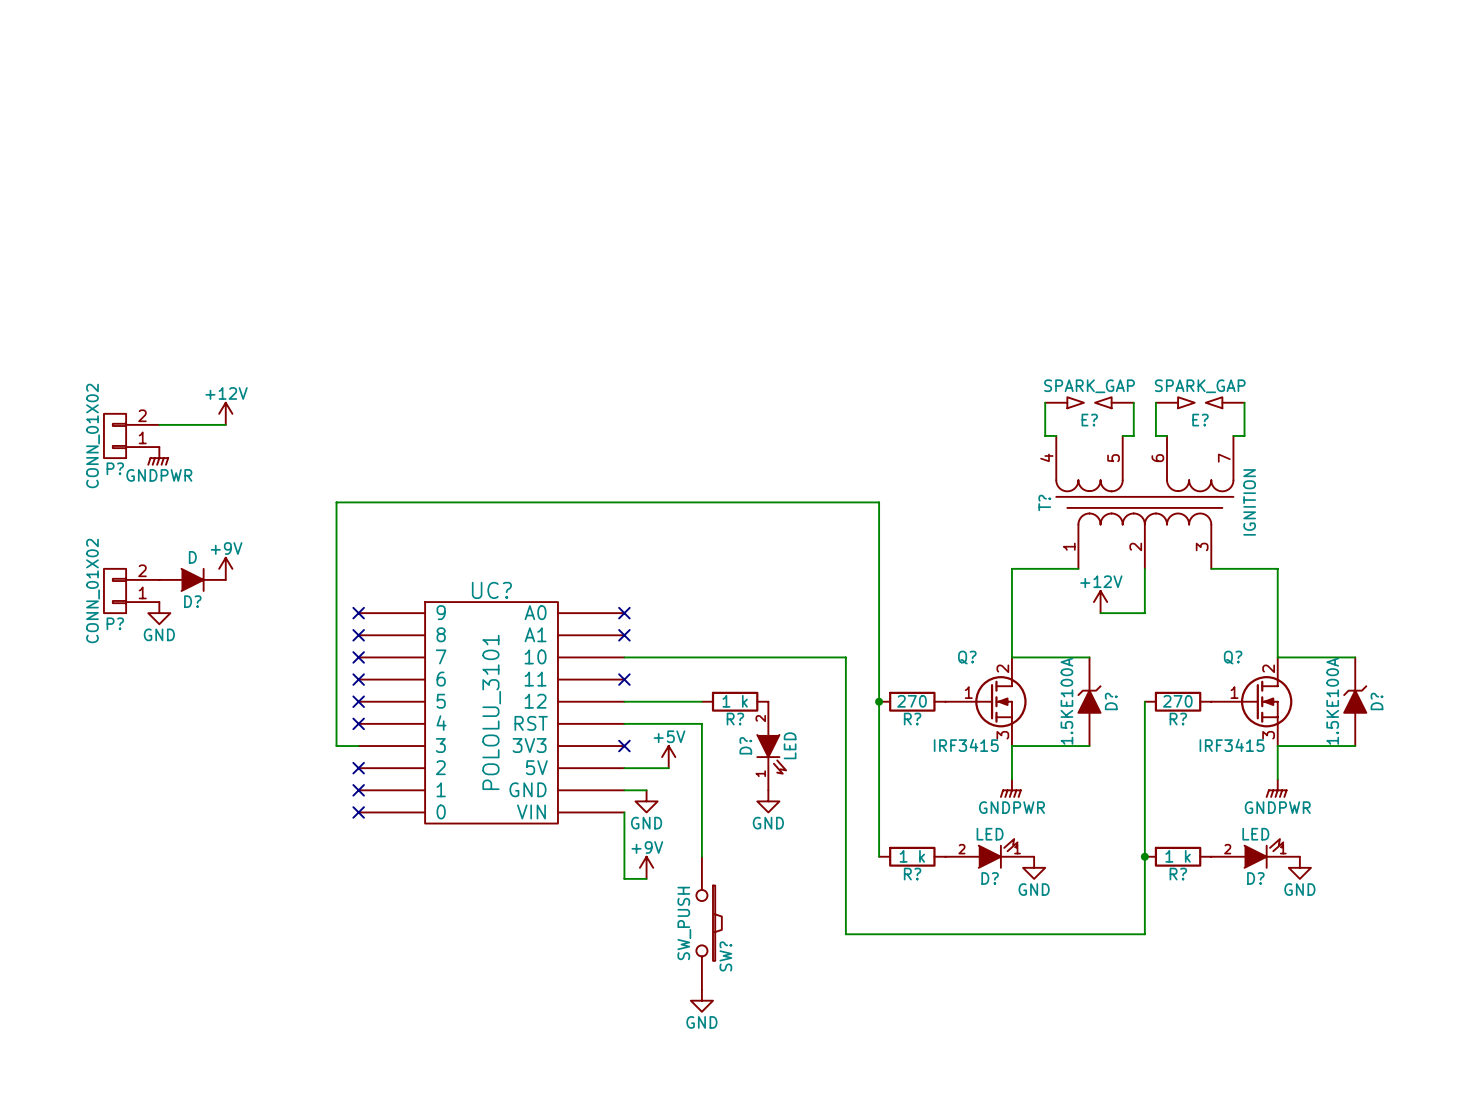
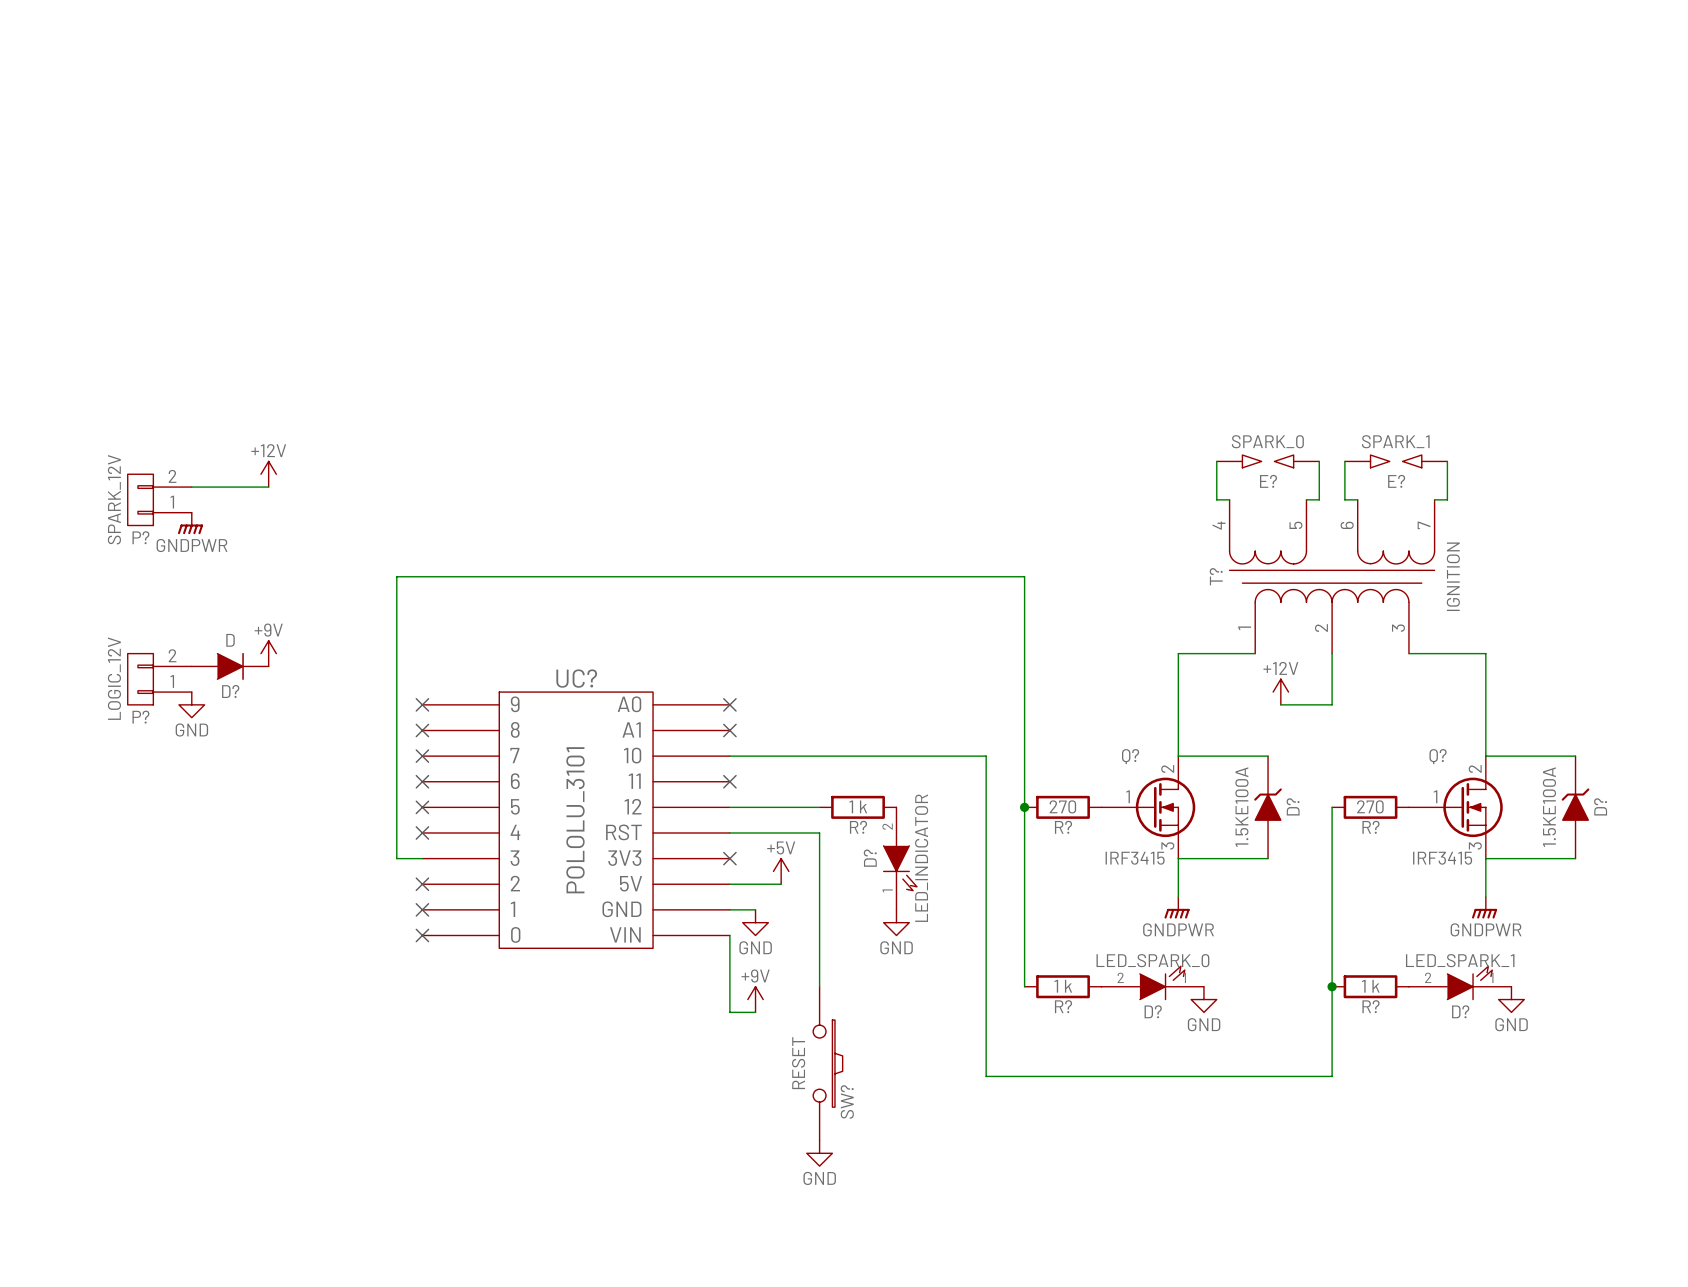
E? value: SPARK_GAP (1089, 386) -> SPARK_0 (1267, 441)
E? value: SPARK_GAP (1200, 386) -> SPARK_1 (1395, 441)
P? value: CONN_01X02 (93, 435) -> SPARK_12V (114, 499)
P? value: CONN_01X02 (93, 590) -> LOGIC_12V (114, 678)
D? value: LED (790, 745) -> LED_INDICATOR (921, 858)
D? value: LED (990, 834) -> LED_SPARK_0 (1152, 960)
D? value: LED (1255, 834) -> LED_SPARK_1 (1460, 960)
SW? value: SW_PUSH (684, 923) -> RESET (798, 1063)

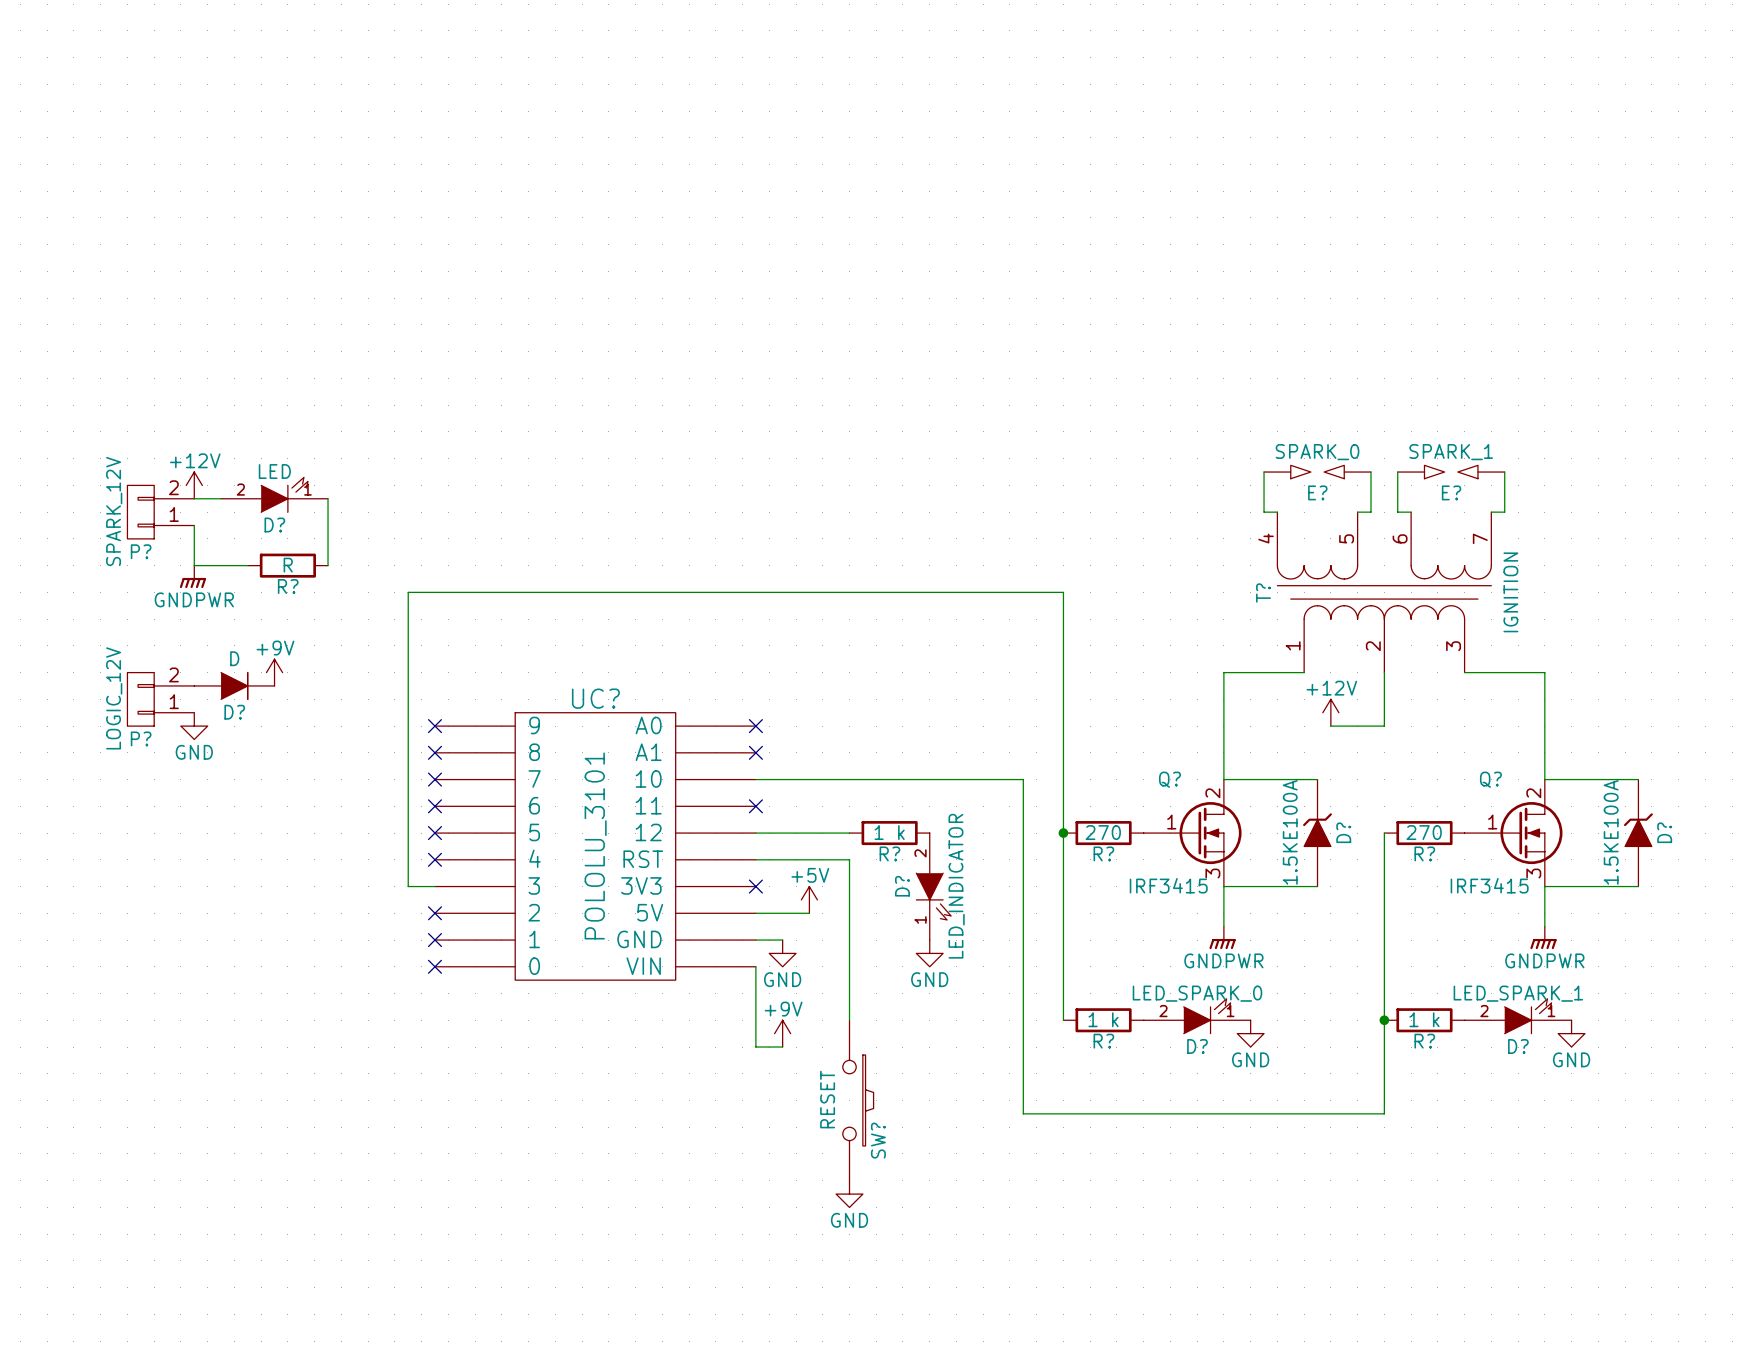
power symbol position: +12V (268, 474) -> +12V (194, 485)
D?: none -> LED (274, 494)
wire: none -> (328, 498) (328, 565)
wire: none -> (194, 525) (194, 565) (247, 565)
power symbol position: GNDPWR (190, 523) -> GNDPWR (192, 576)
R?: none -> R (287, 565)

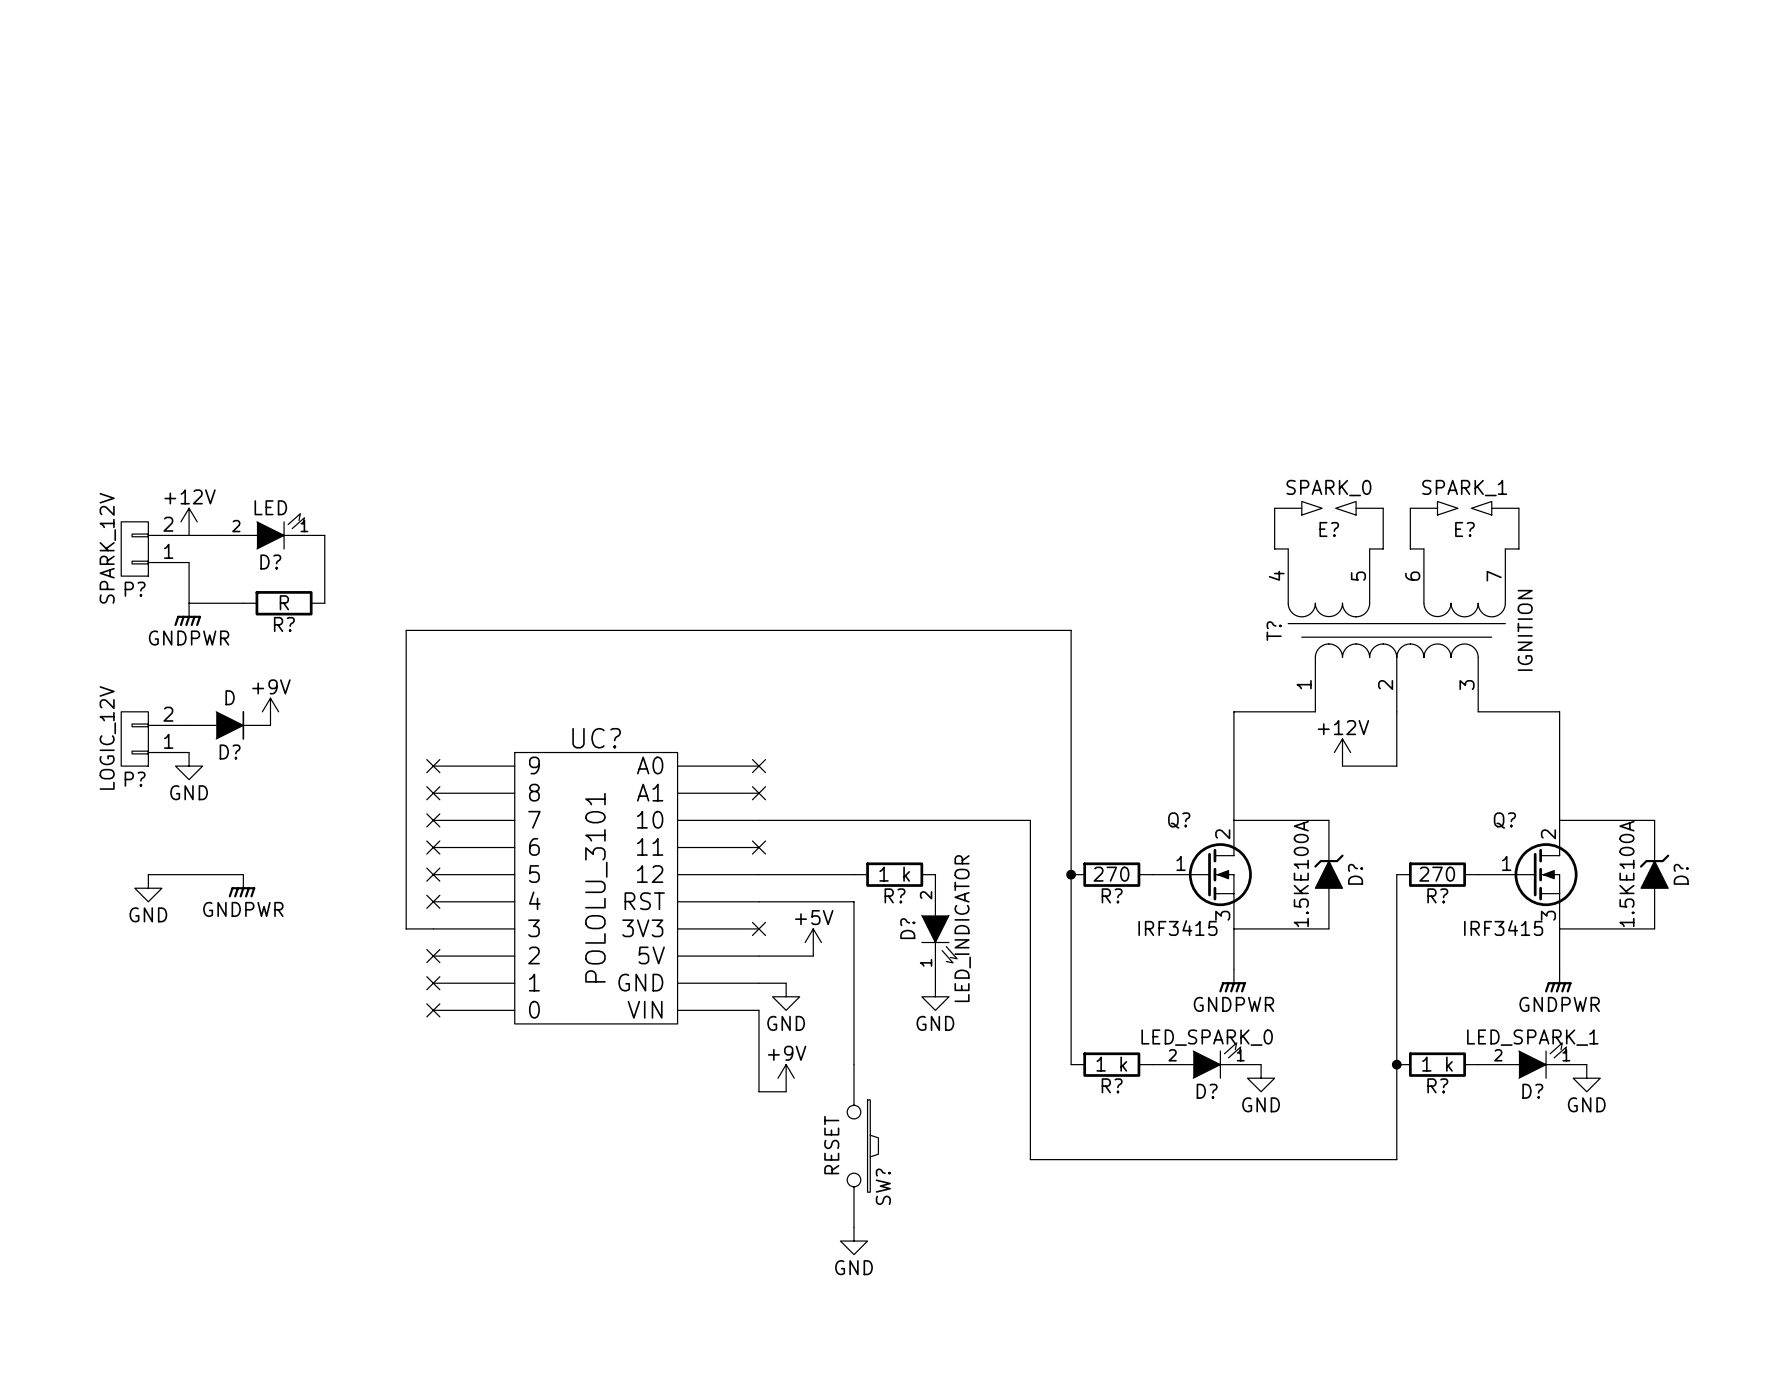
wire: none -> (148, 874) (243, 874)
power symbol: none -> GNDPWR (241, 886)
power symbol: none -> GND (148, 888)

